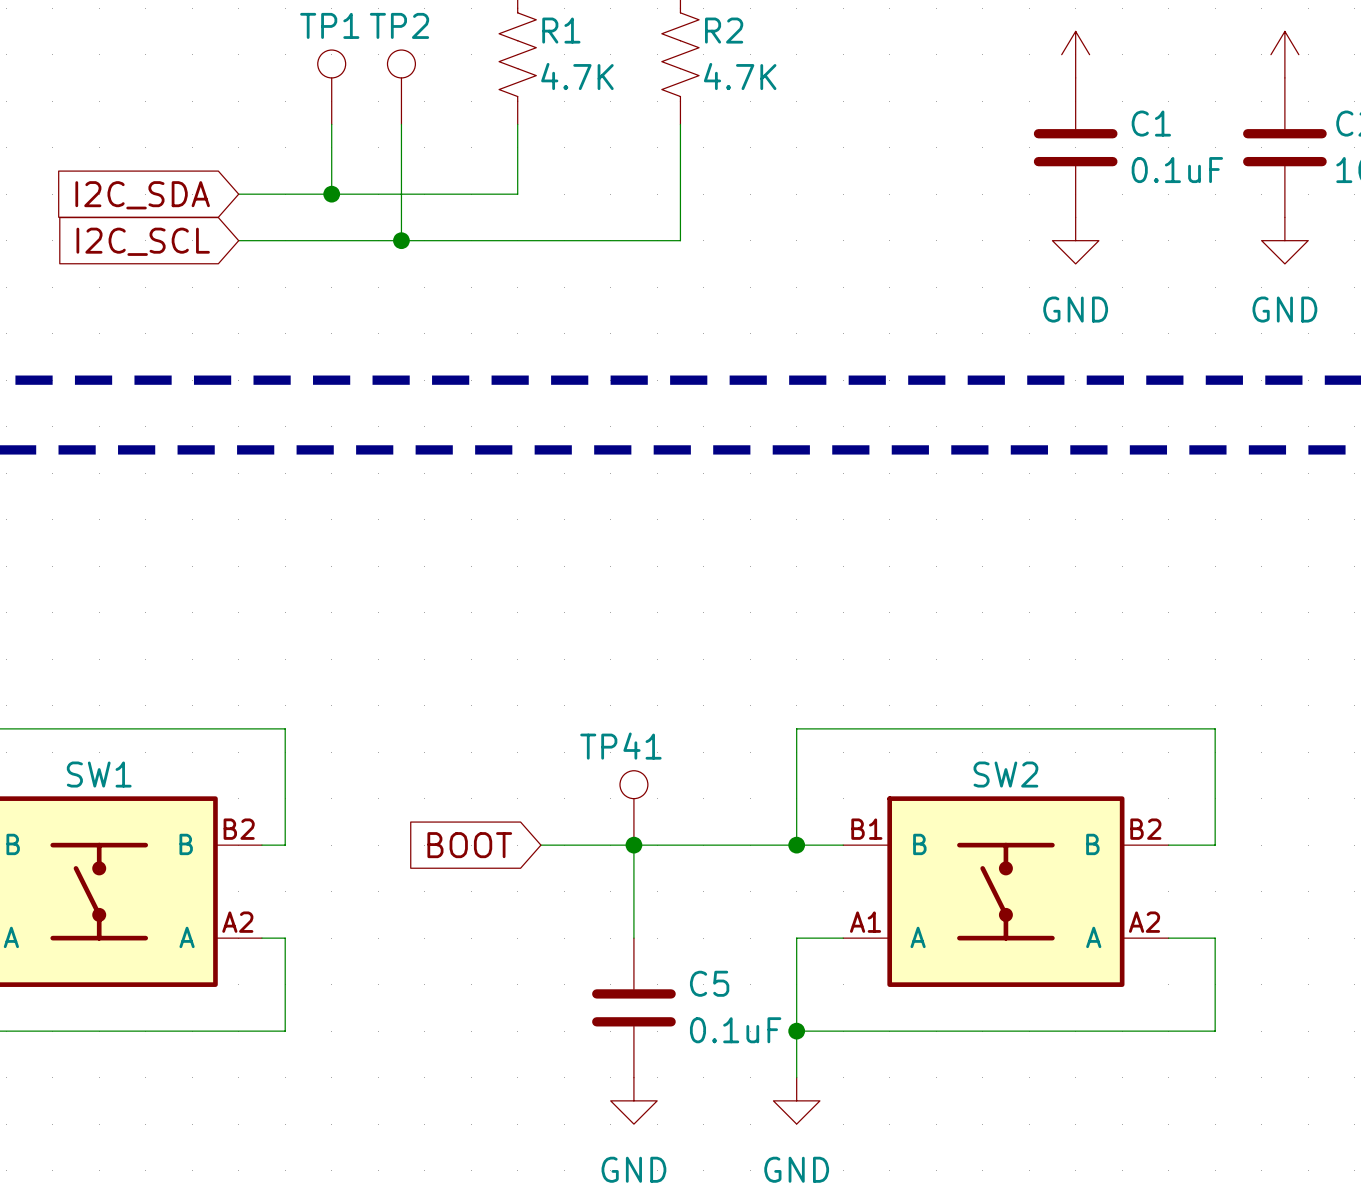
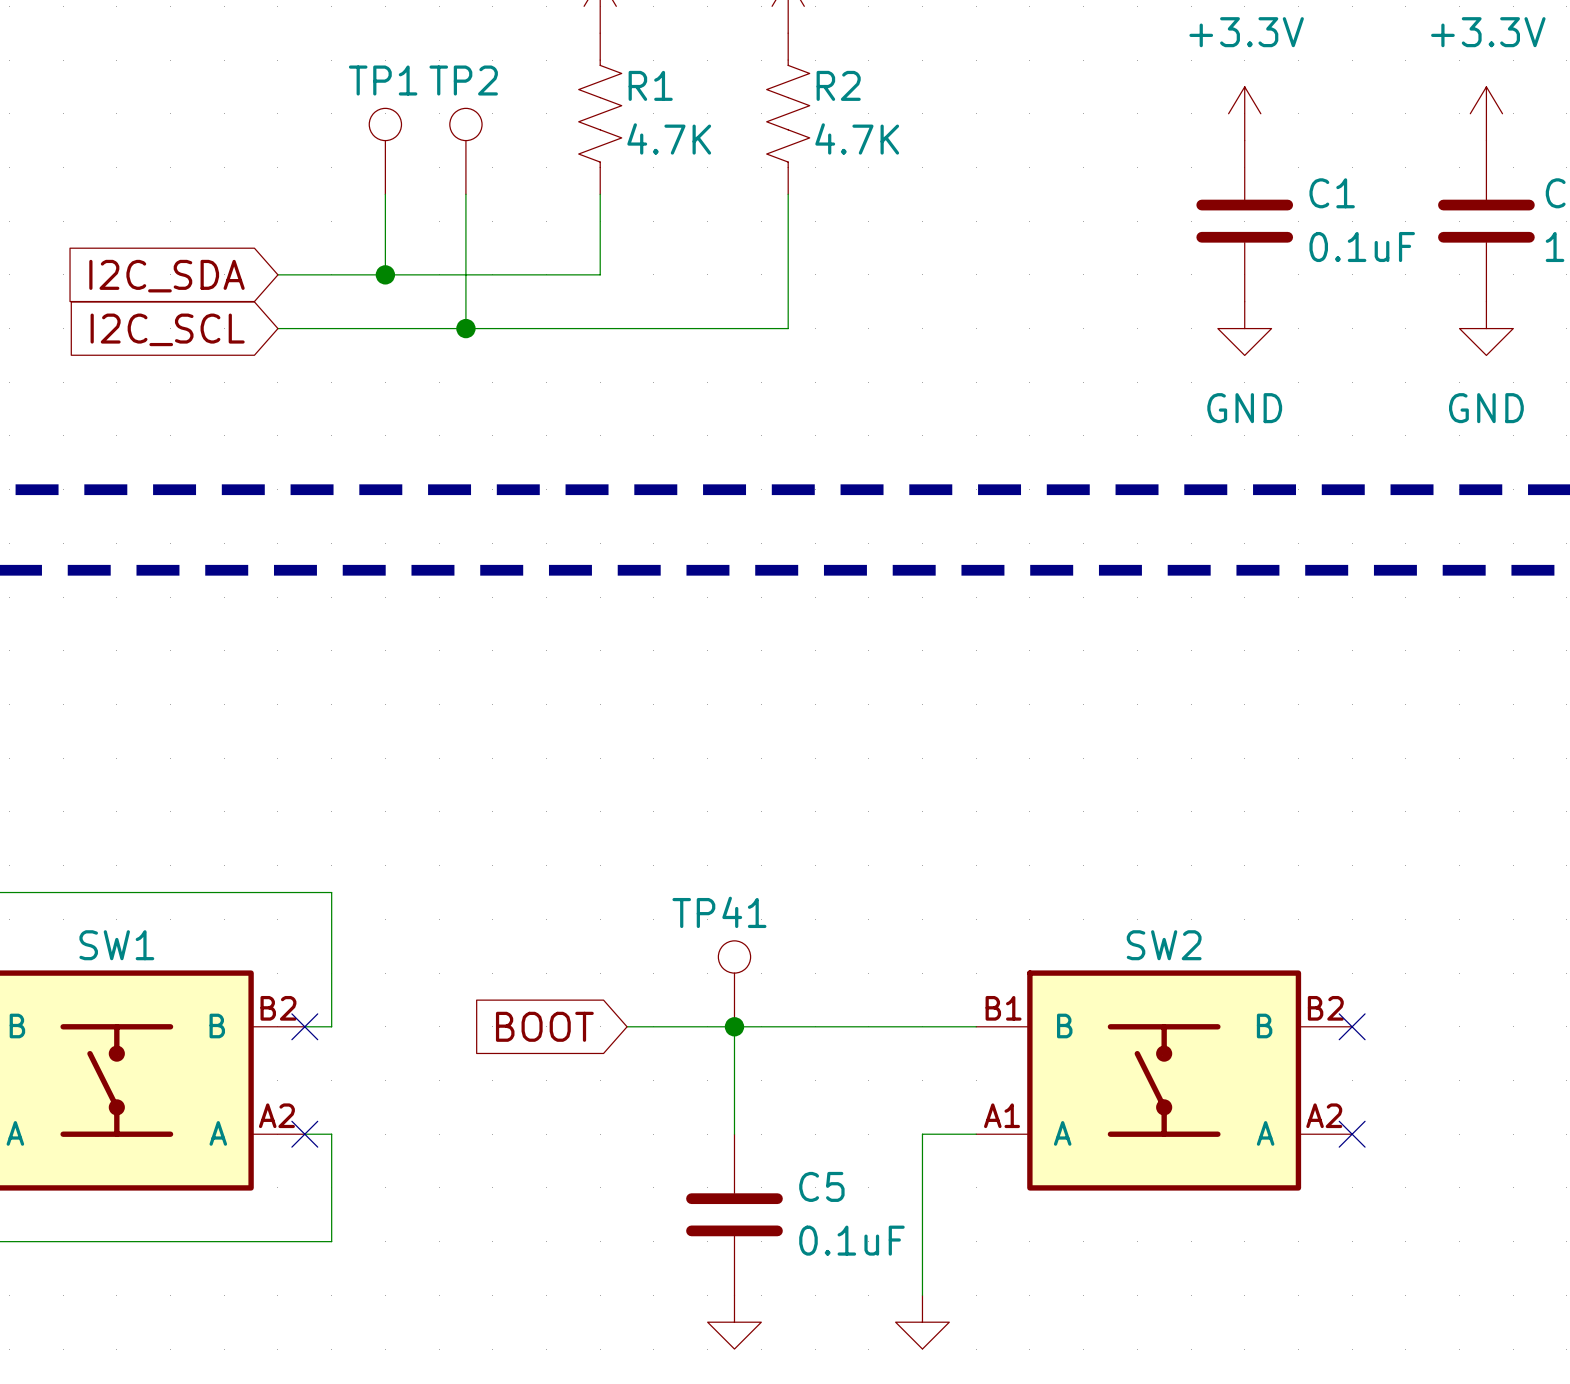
no-connect mark: none -> (304, 1026)
wire: (796, 845) (796, 728) (1215, 728) (1215, 845) (1168, 845) -> none
junction: (796, 845) -> none
no-connect mark: none -> (1352, 1026)
no-connect mark: none -> (304, 1134)
wire: (1168, 938) (1215, 938) (1215, 1031) (796, 1031) -> none
no-connect mark: none -> (1352, 1134)
junction: (796, 1031) -> none

